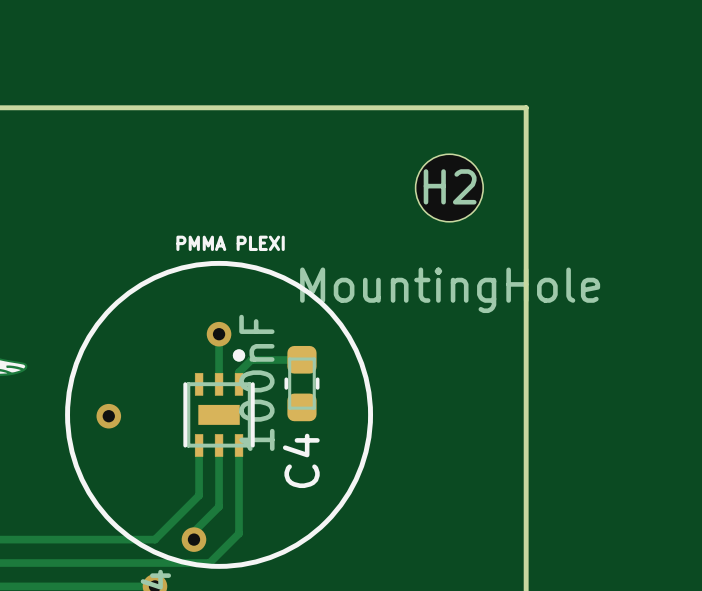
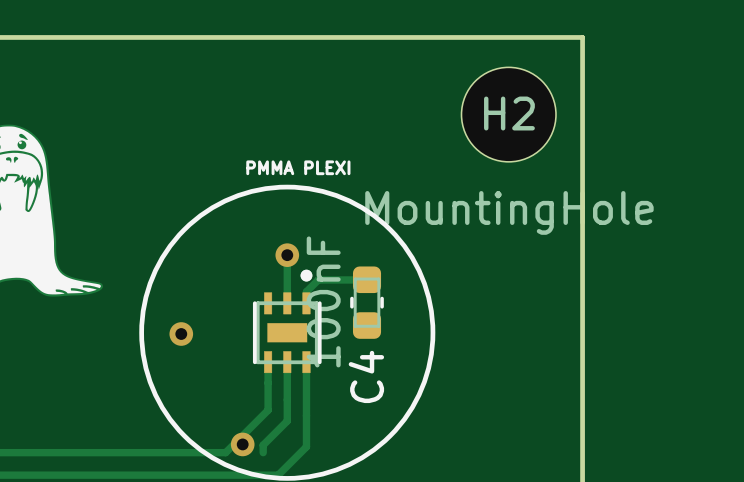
H2 footprint: [415, 154, 484, 222] -> [461, 67, 556, 162]
via position: (193, 539) -> (242, 444)

